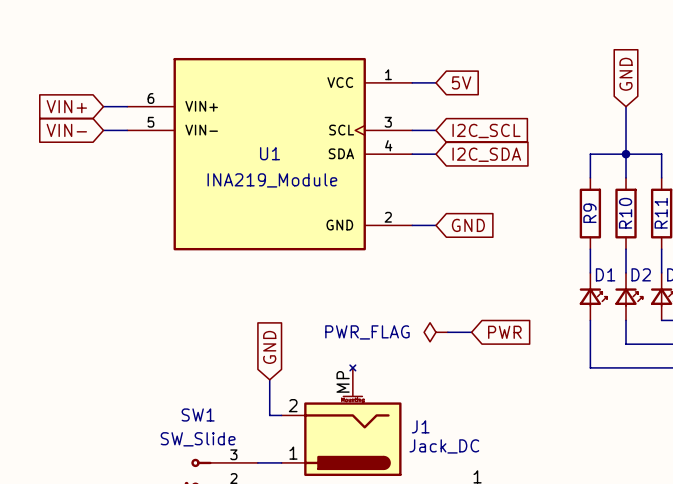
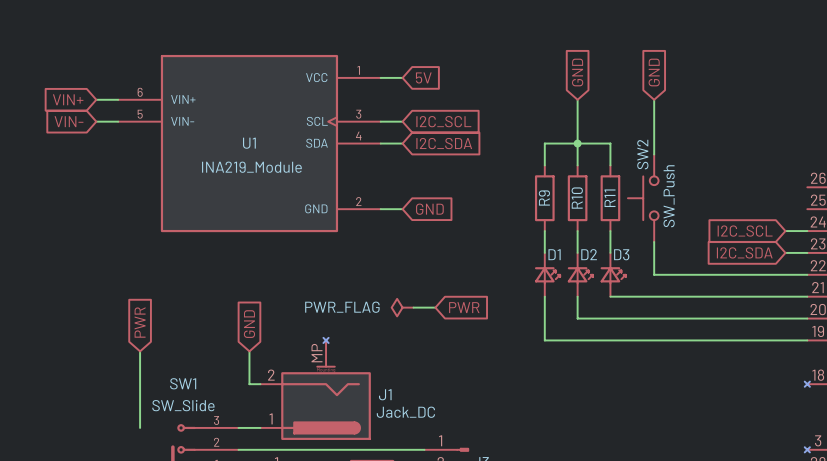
global label: none -> PWR (140, 322)
wire: none -> (140, 351) (140, 427)

